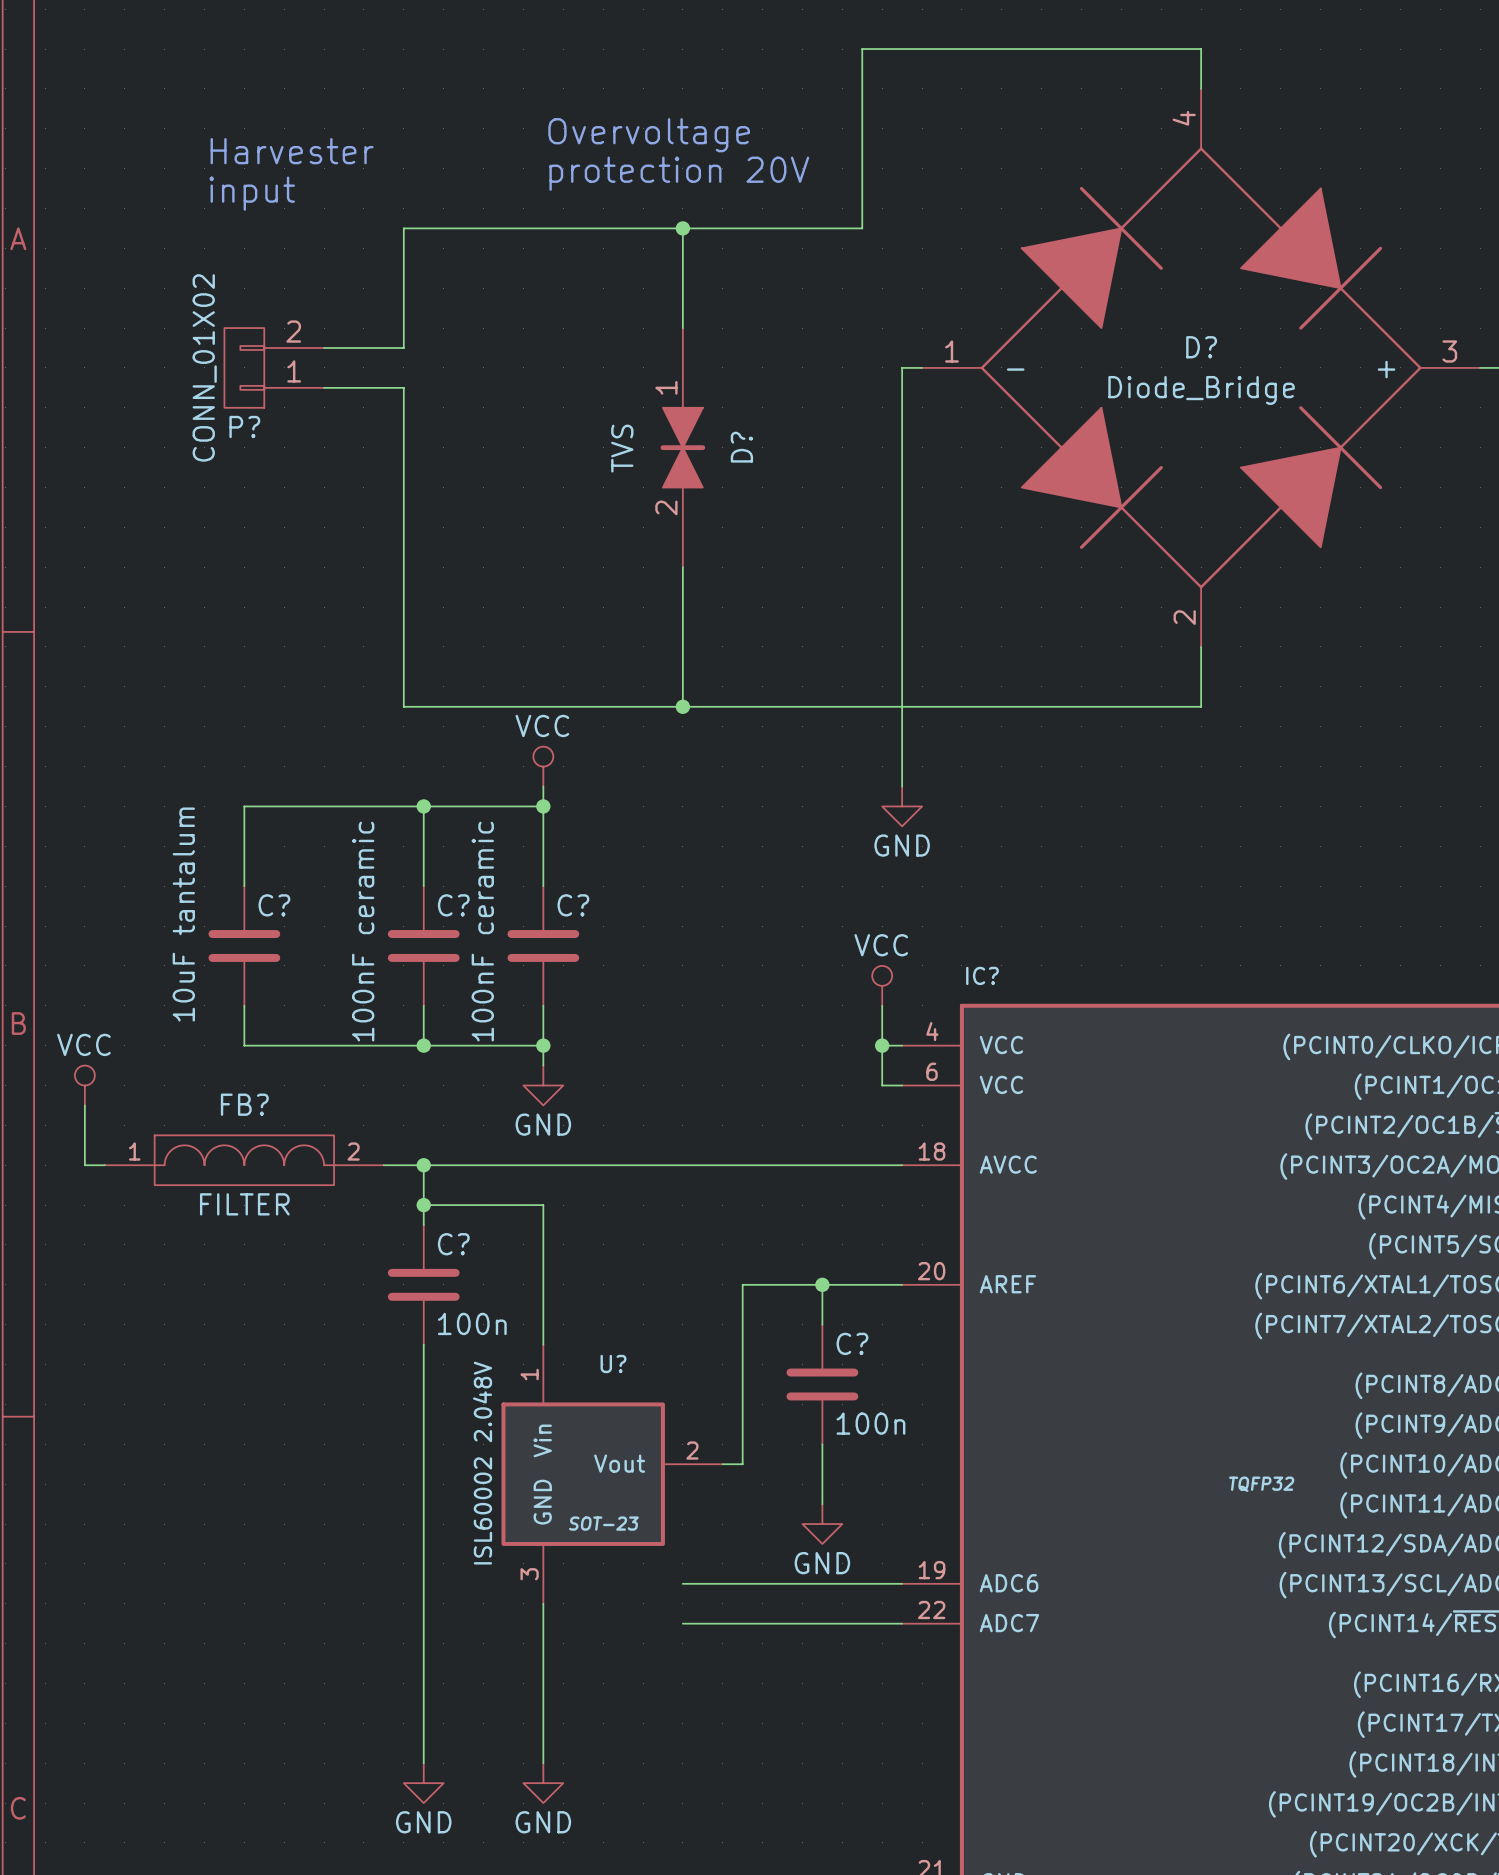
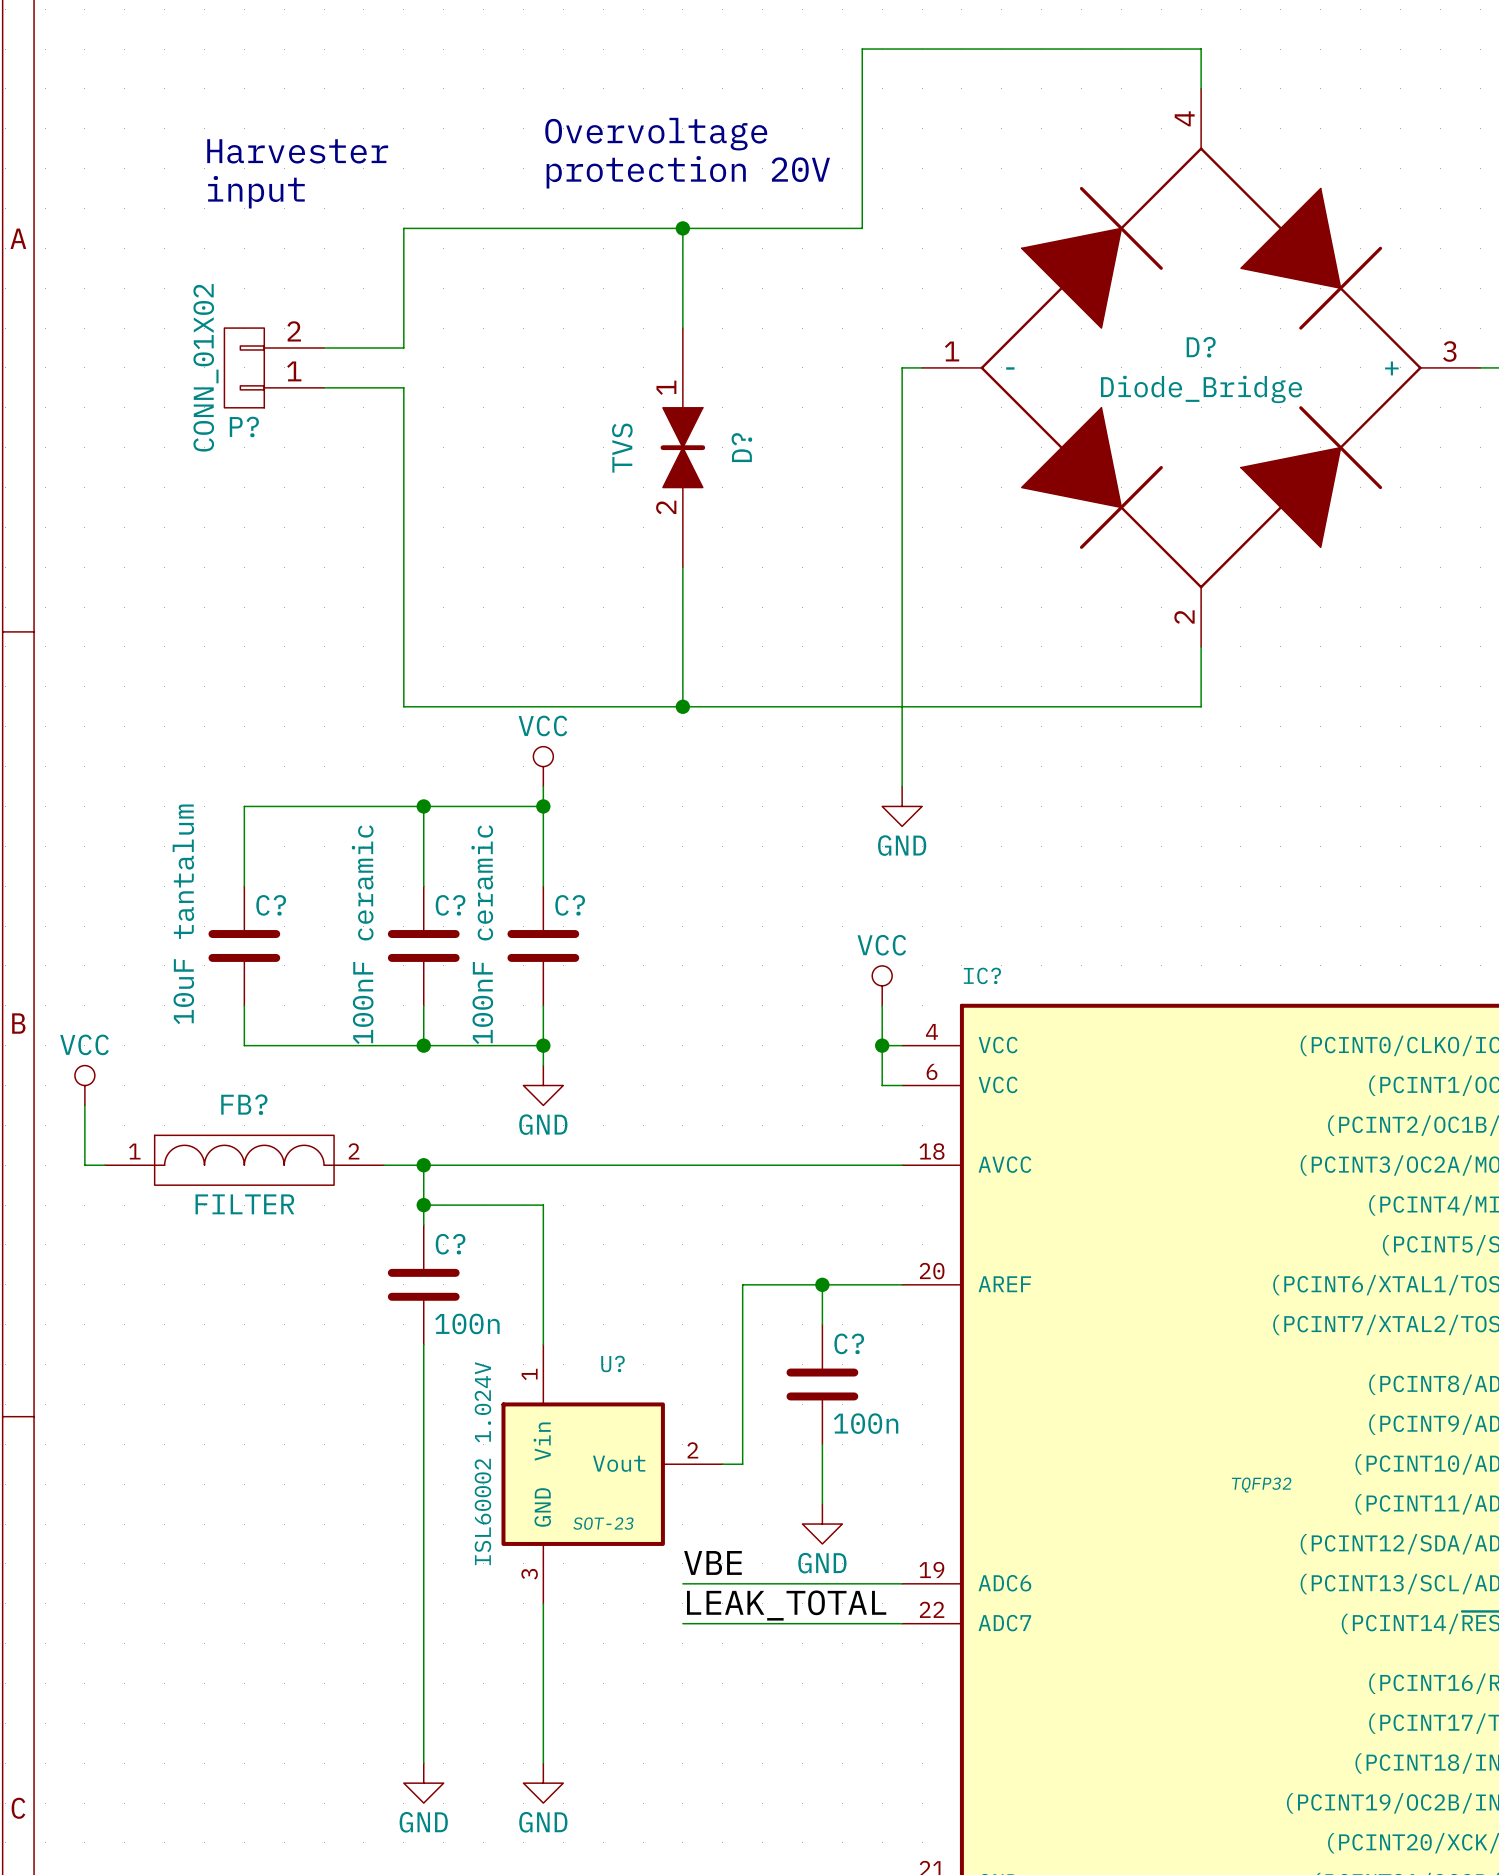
U? value: ISL60002 2.048V (482, 1463) -> ISL60002 1.024V (482, 1463)
label: none -> VBE (712, 1562)
label: none -> LEAK_TOTAL (786, 1605)

